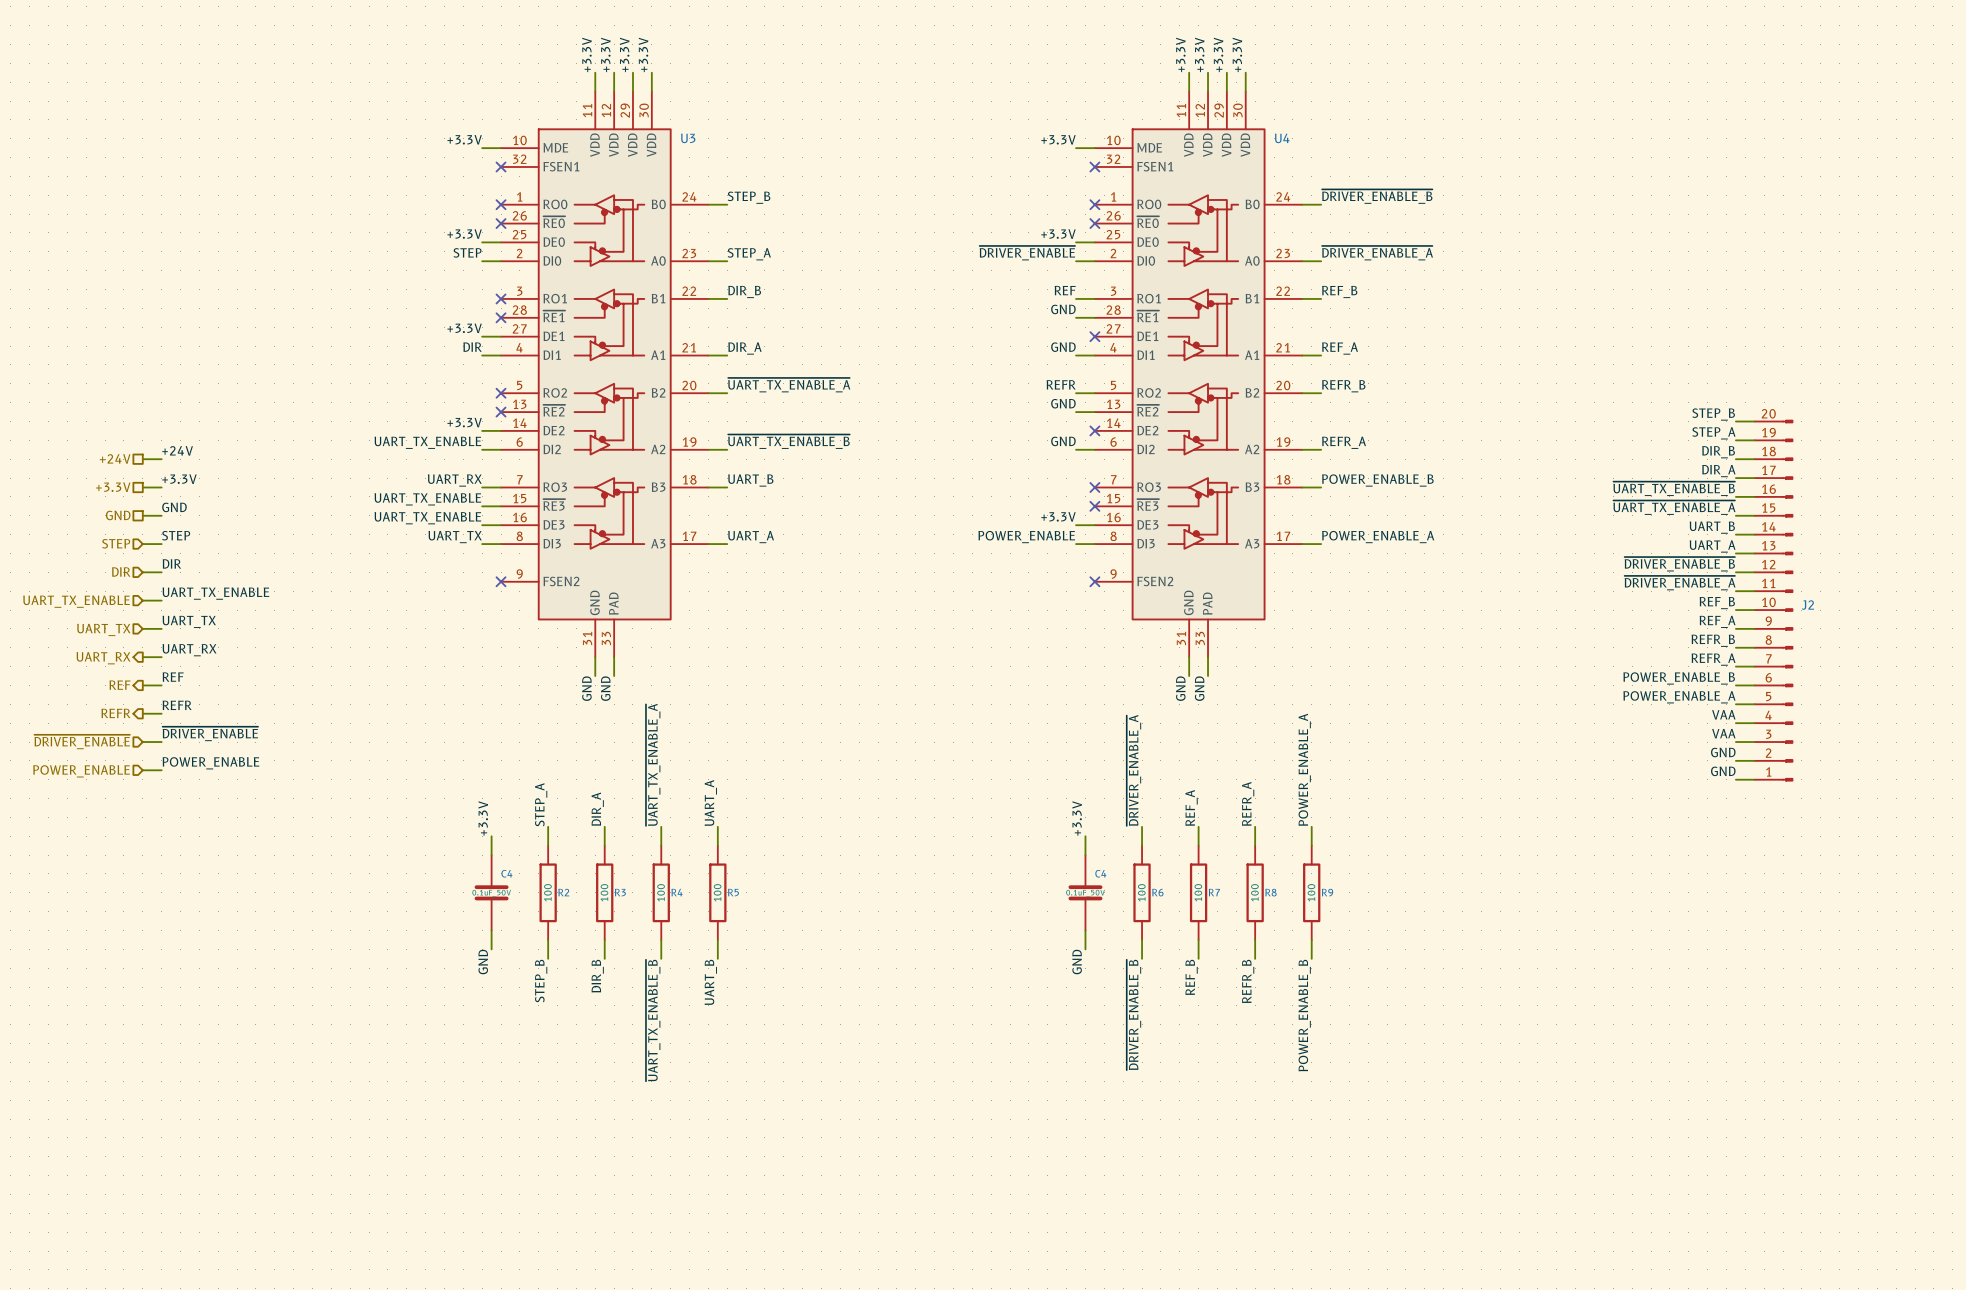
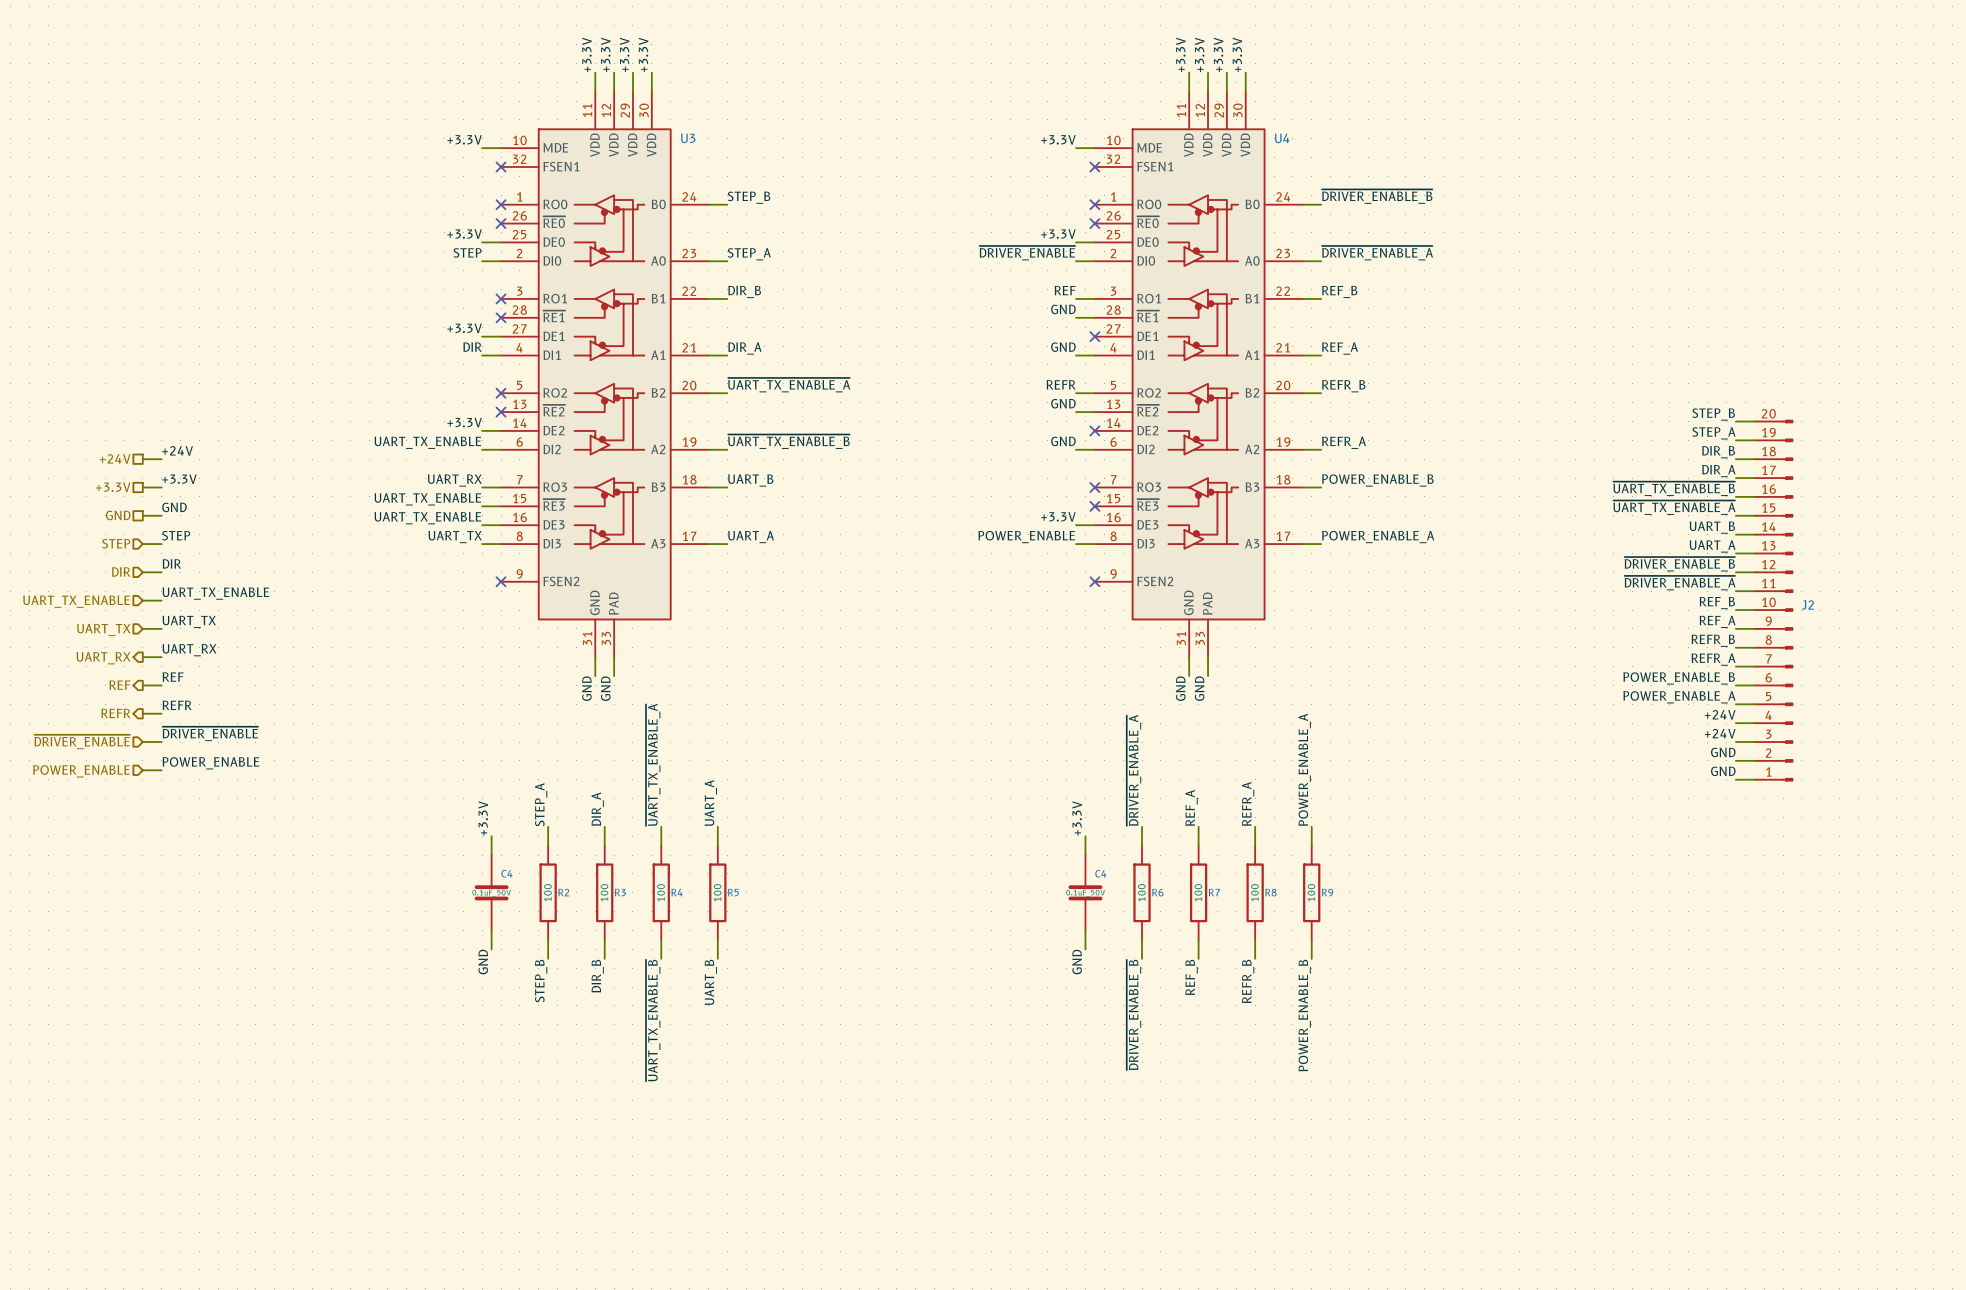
label: VAA (1723, 714) -> +24V (1720, 714)
label: VAA (1723, 733) -> +24V (1720, 733)

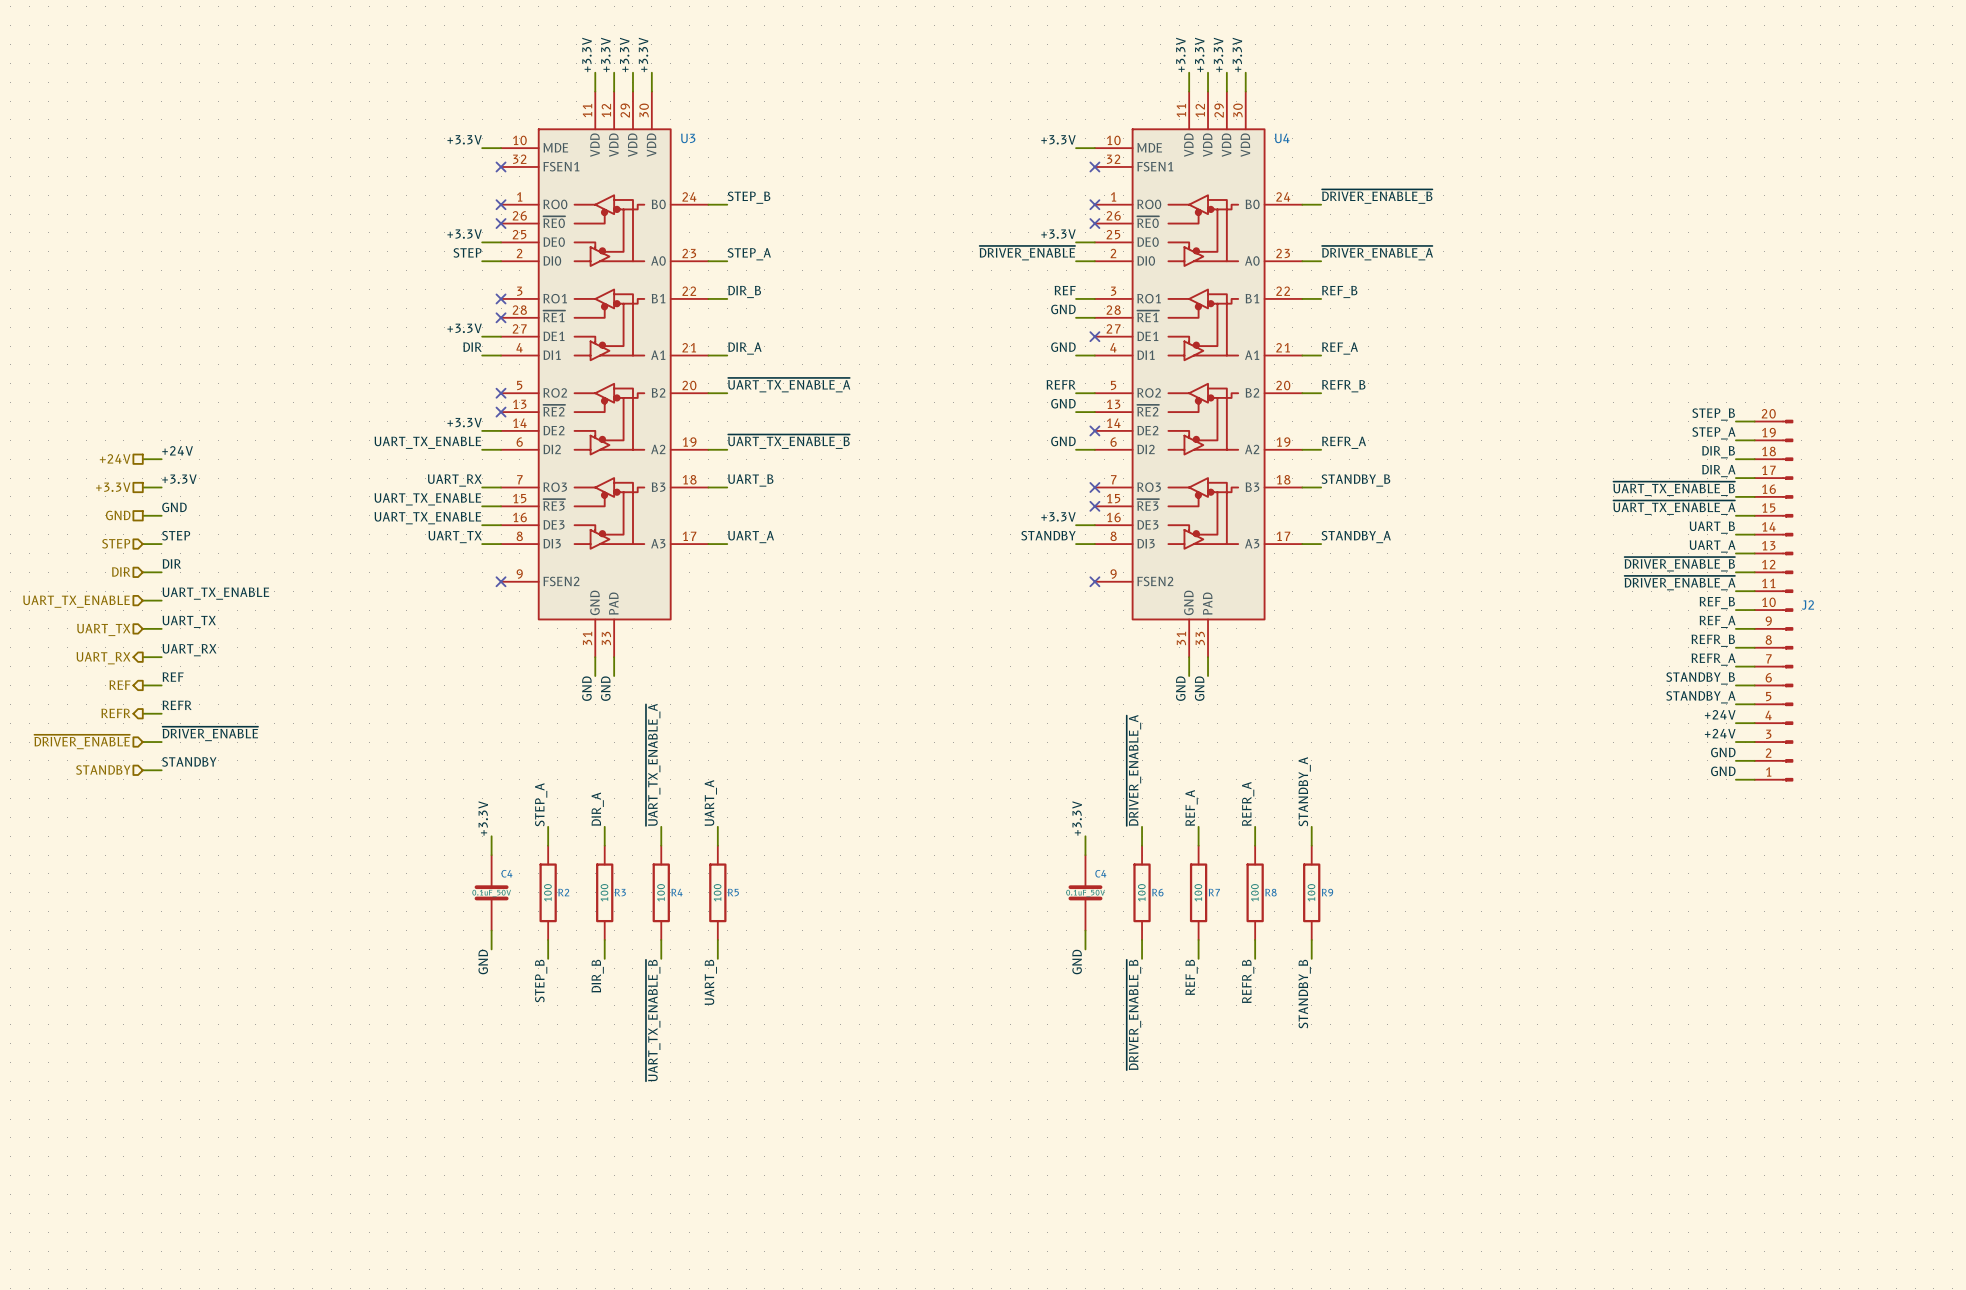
label: POWER_ENABLE_B (1377, 480) -> STANDBY_B (1355, 480)
label: POWER_ENABLE (1026, 537) -> STANDBY (1048, 535)
label: POWER_ENABLE_A (1378, 537) -> STANDBY_A (1356, 537)
label: POWER_ENABLE_B (1679, 678) -> STANDBY_B (1700, 678)
label: POWER_ENABLE_A (1679, 697) -> STANDBY_A (1700, 697)
label: POWER_ENABLE (210, 763) -> STANDBY (189, 761)
label: POWER_ENABLE_A (1304, 769) -> STANDBY_A (1304, 791)
hierarchical label: POWER_ENABLE (81, 771) -> STANDBY (103, 769)
label: POWER_ENABLE_B (1304, 1015) -> STANDBY_B (1304, 994)

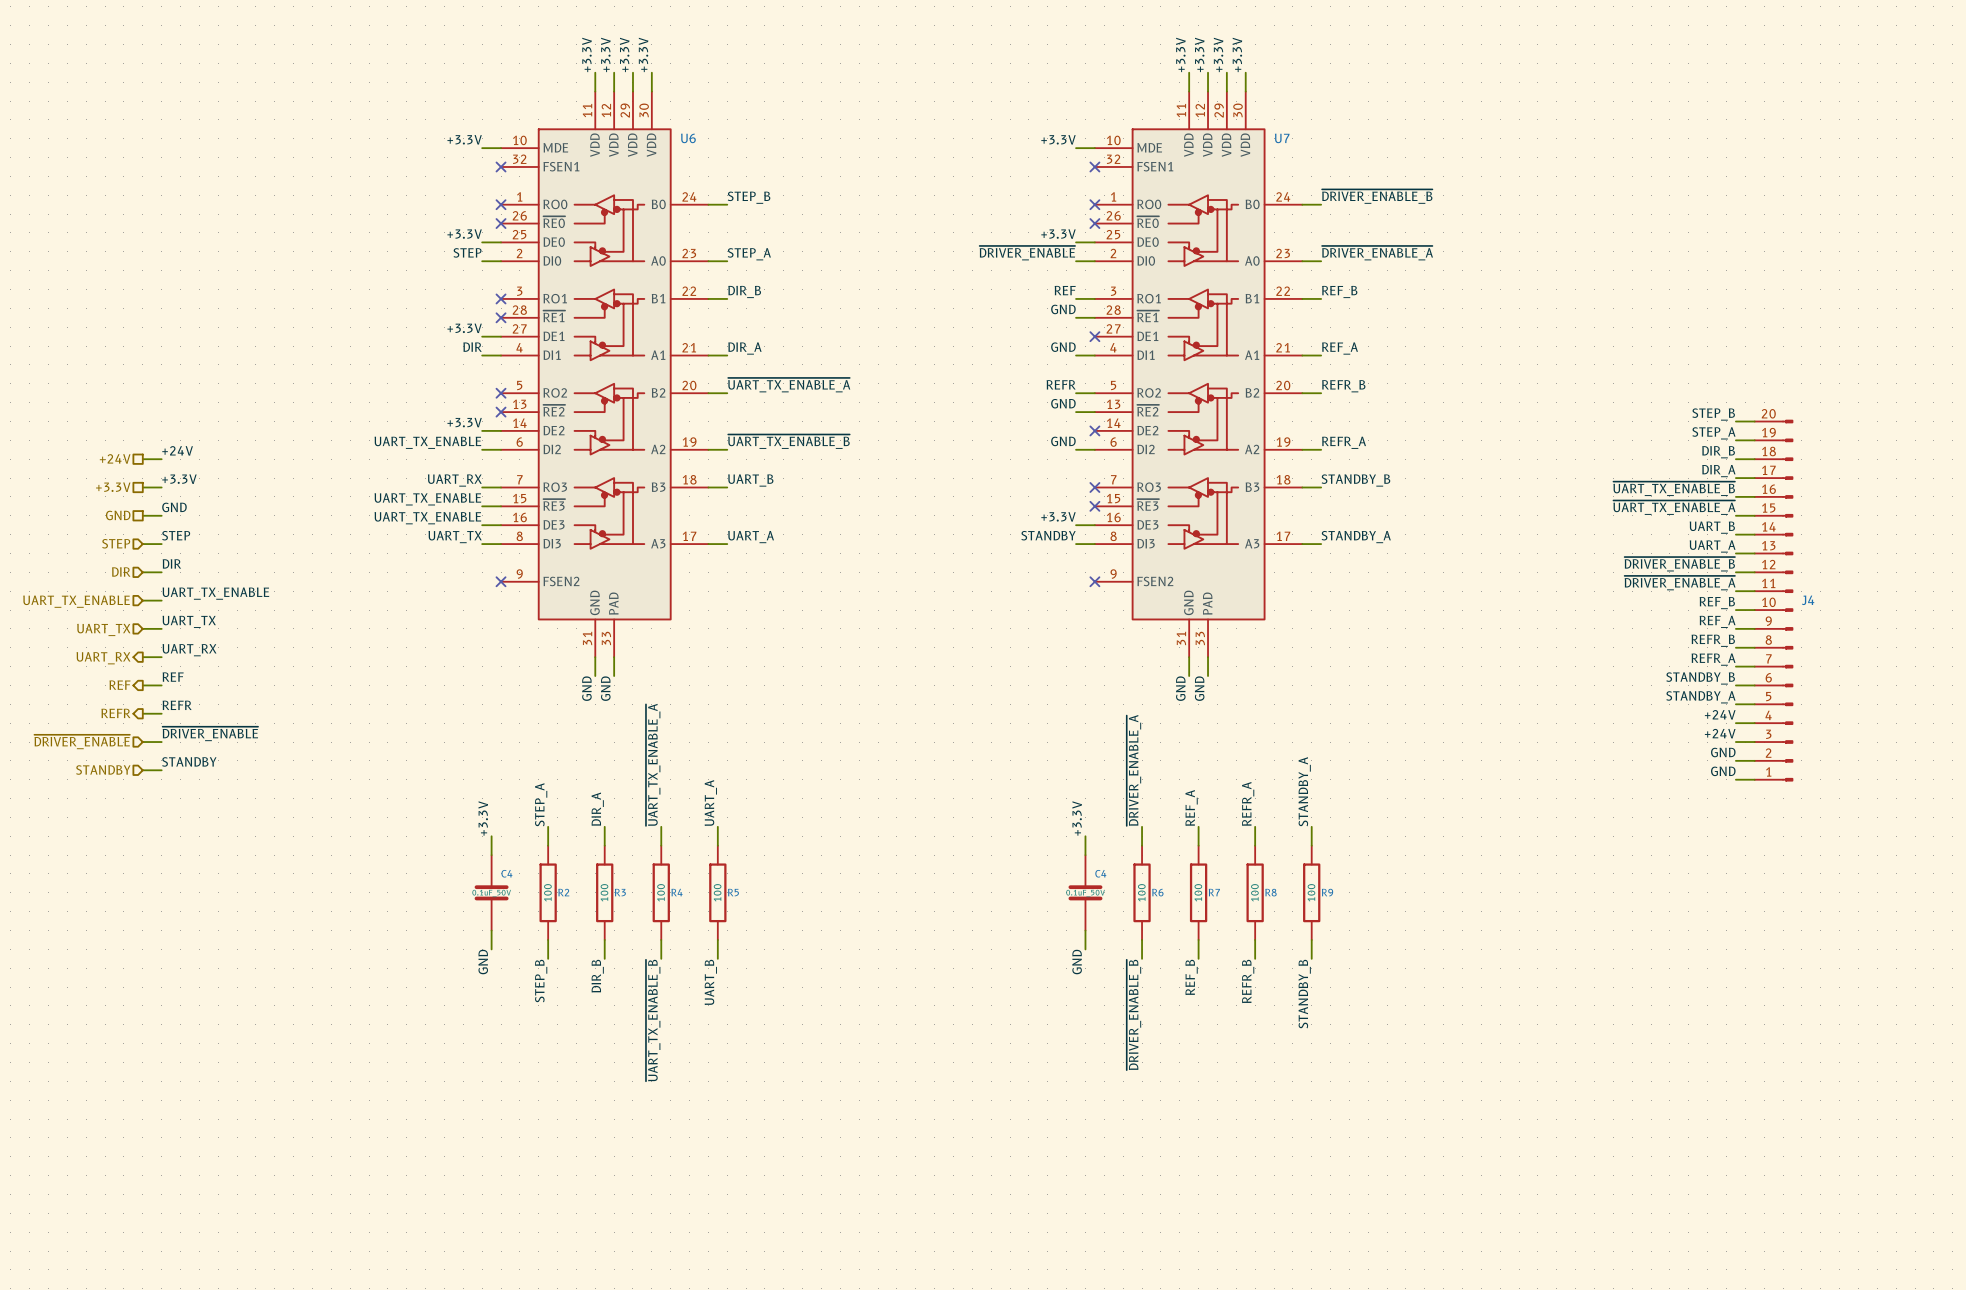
U3 name: U3 (688, 138) -> U6 (688, 138)
U4 name: U4 (1282, 138) -> U7 (1282, 138)
J2 name: J2 (1807, 605) -> J4 (1808, 600)

